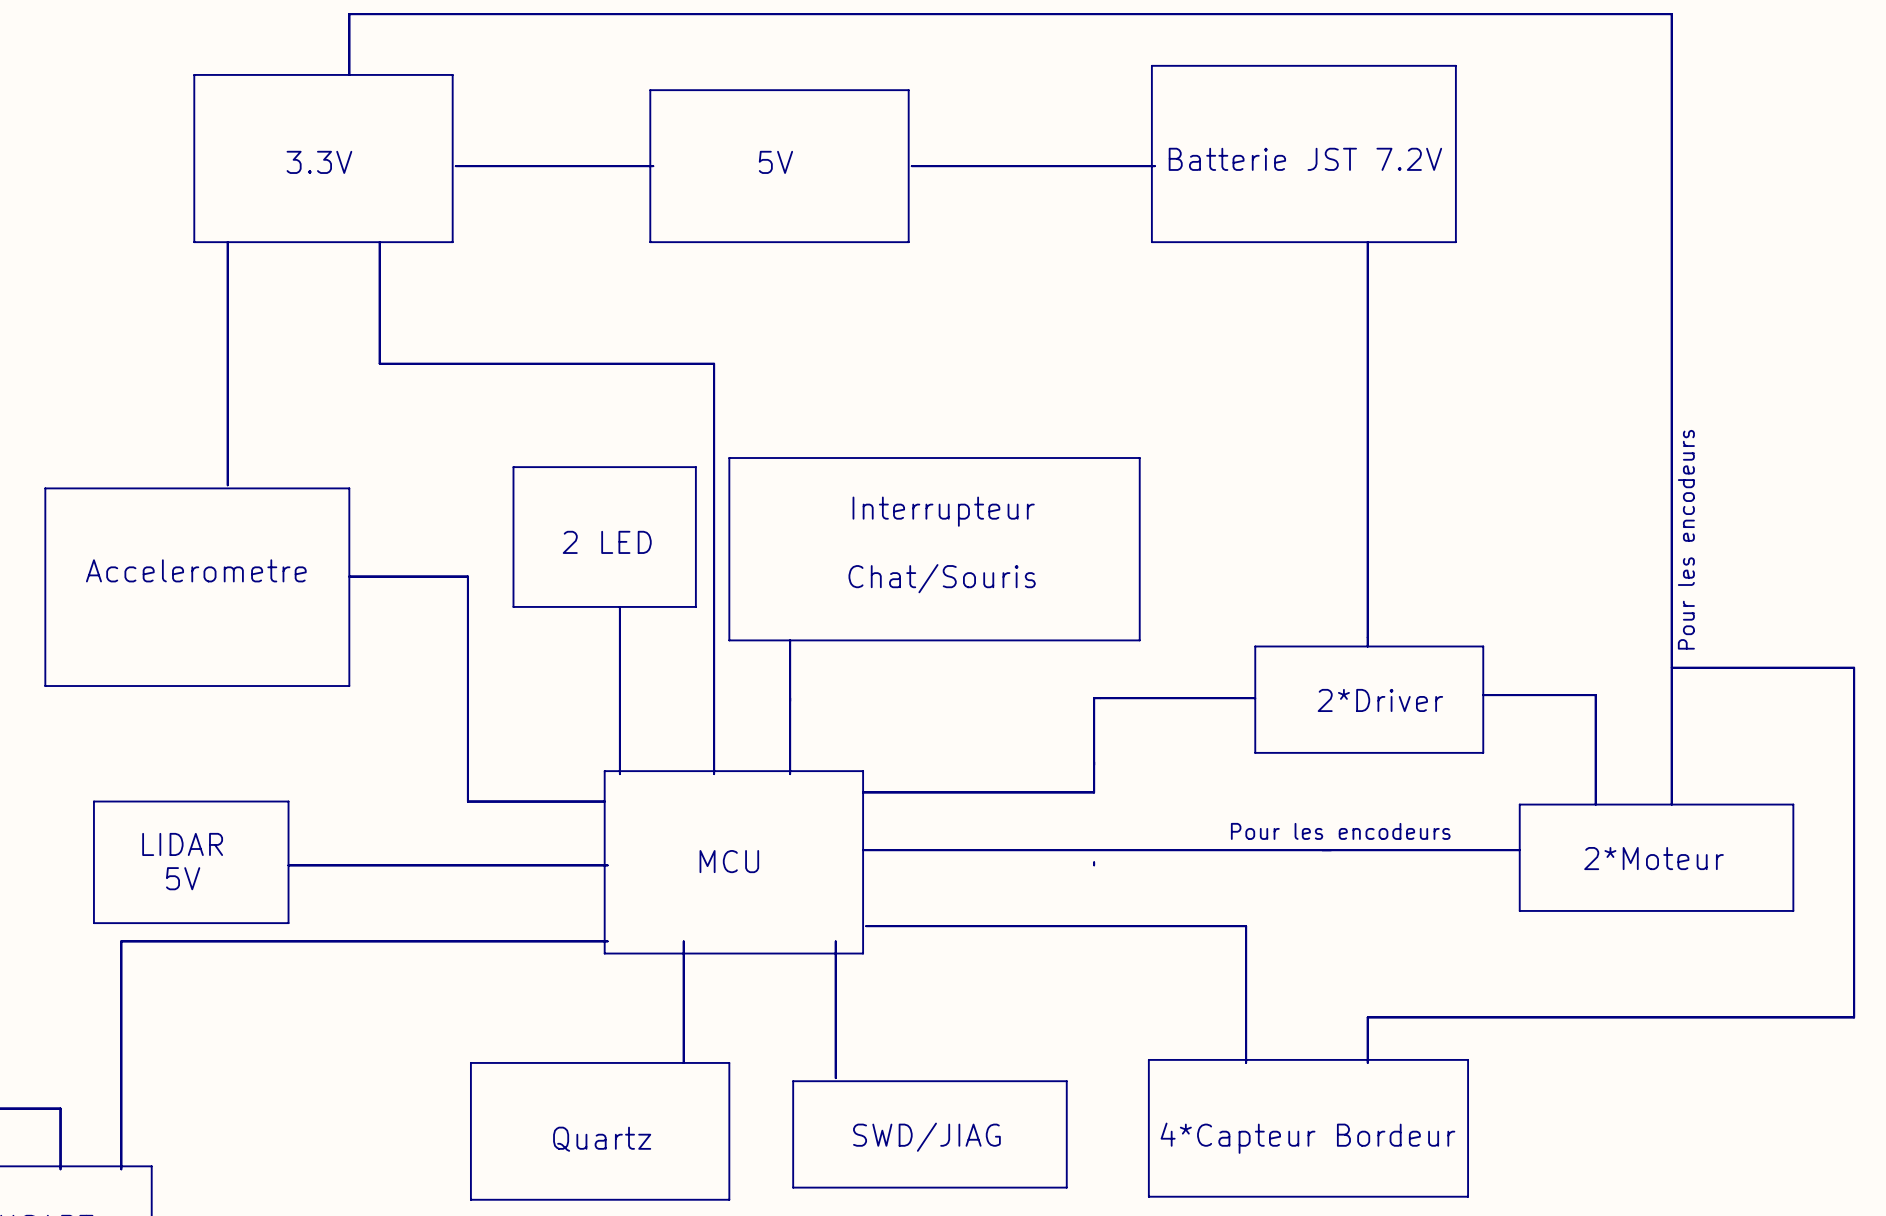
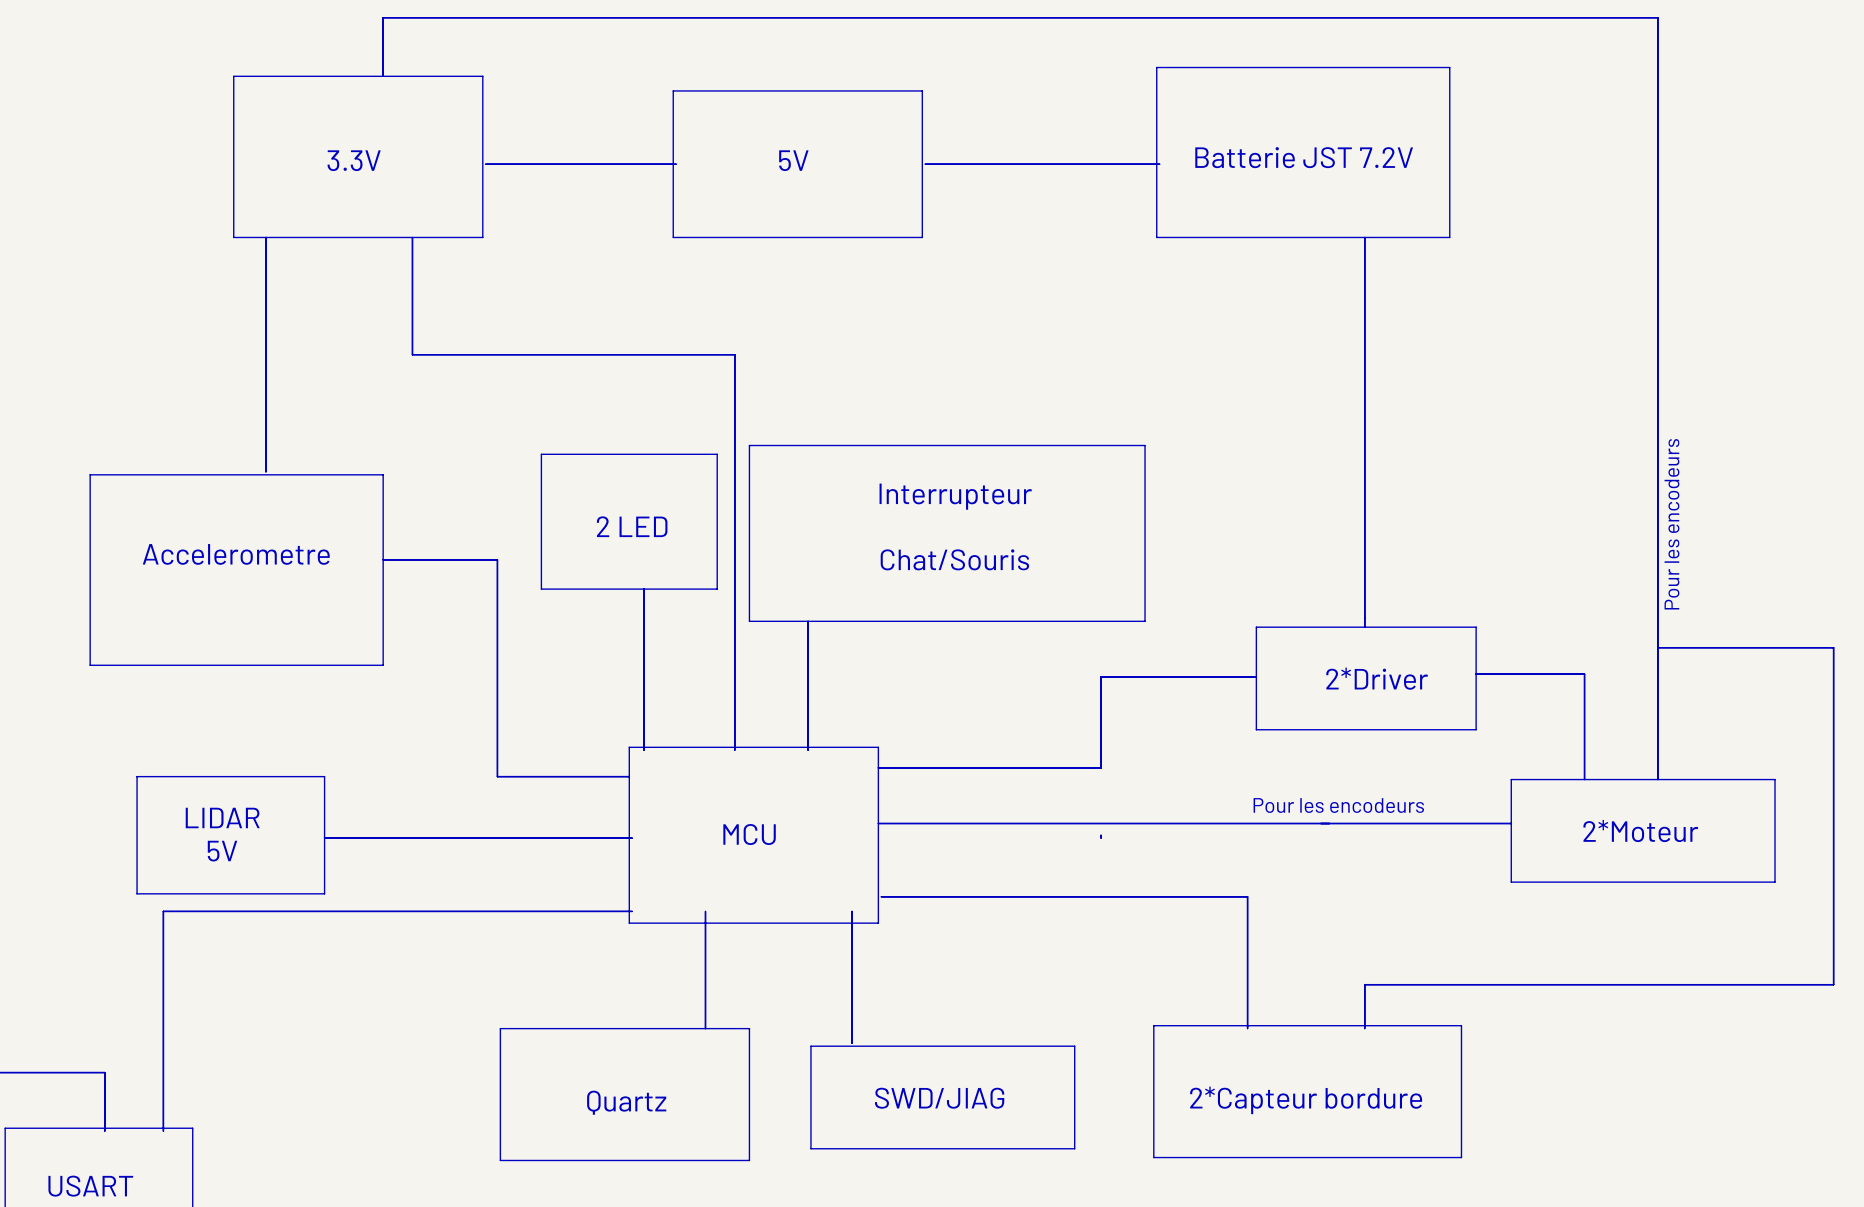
text: 4*Capteur Bordeur (1307, 1138) -> 2*Capteur bordure (1306, 1100)

